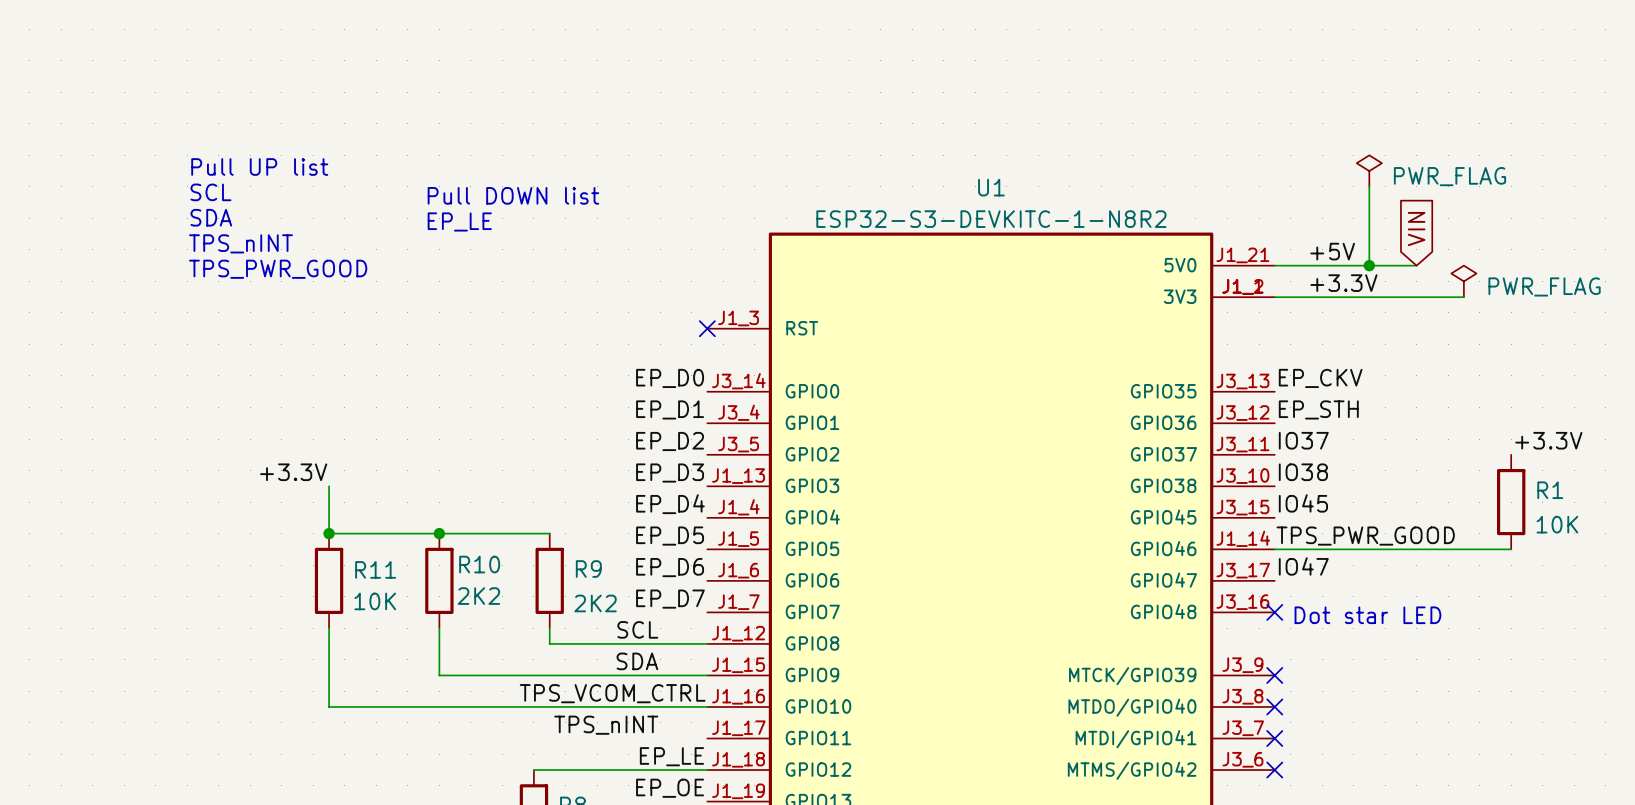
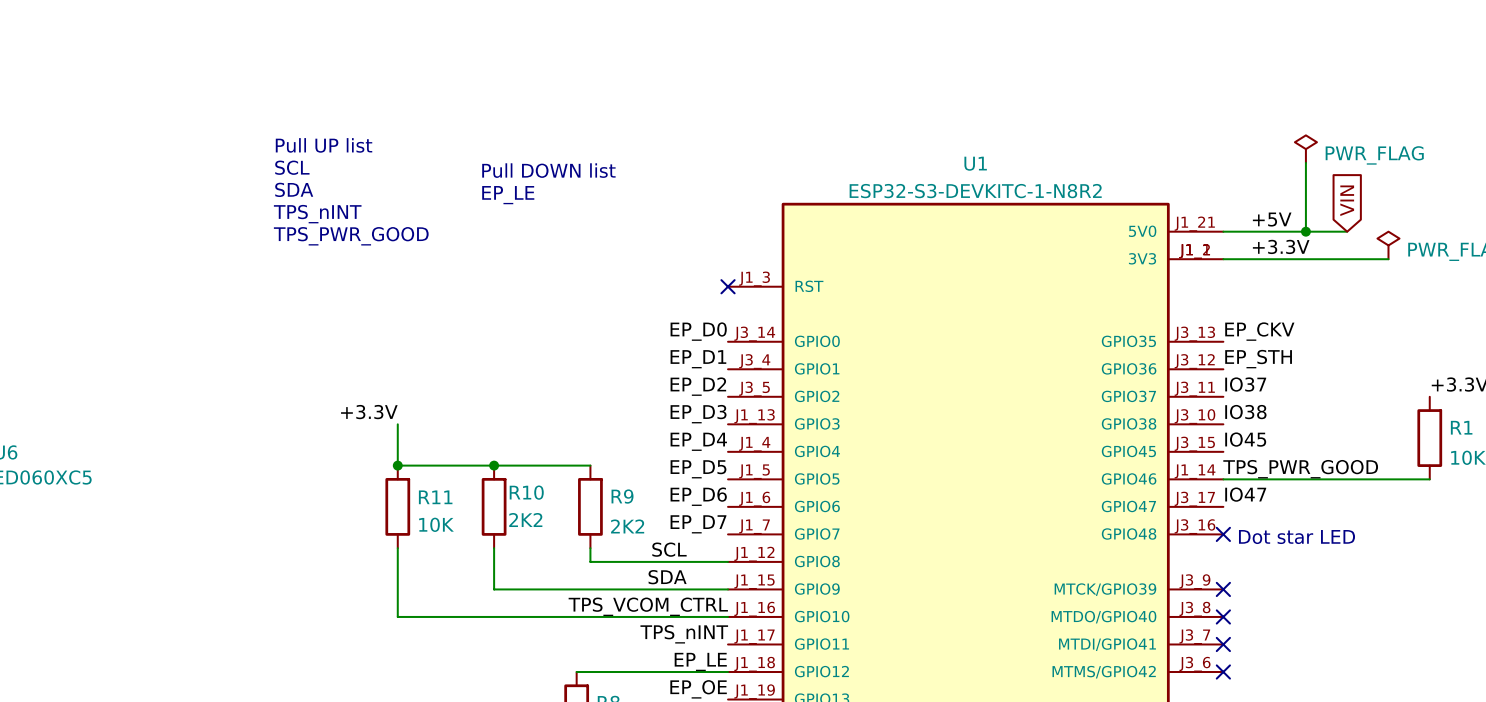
label position: TPS_nINT (606, 725) -> TPS_nINT (684, 634)

